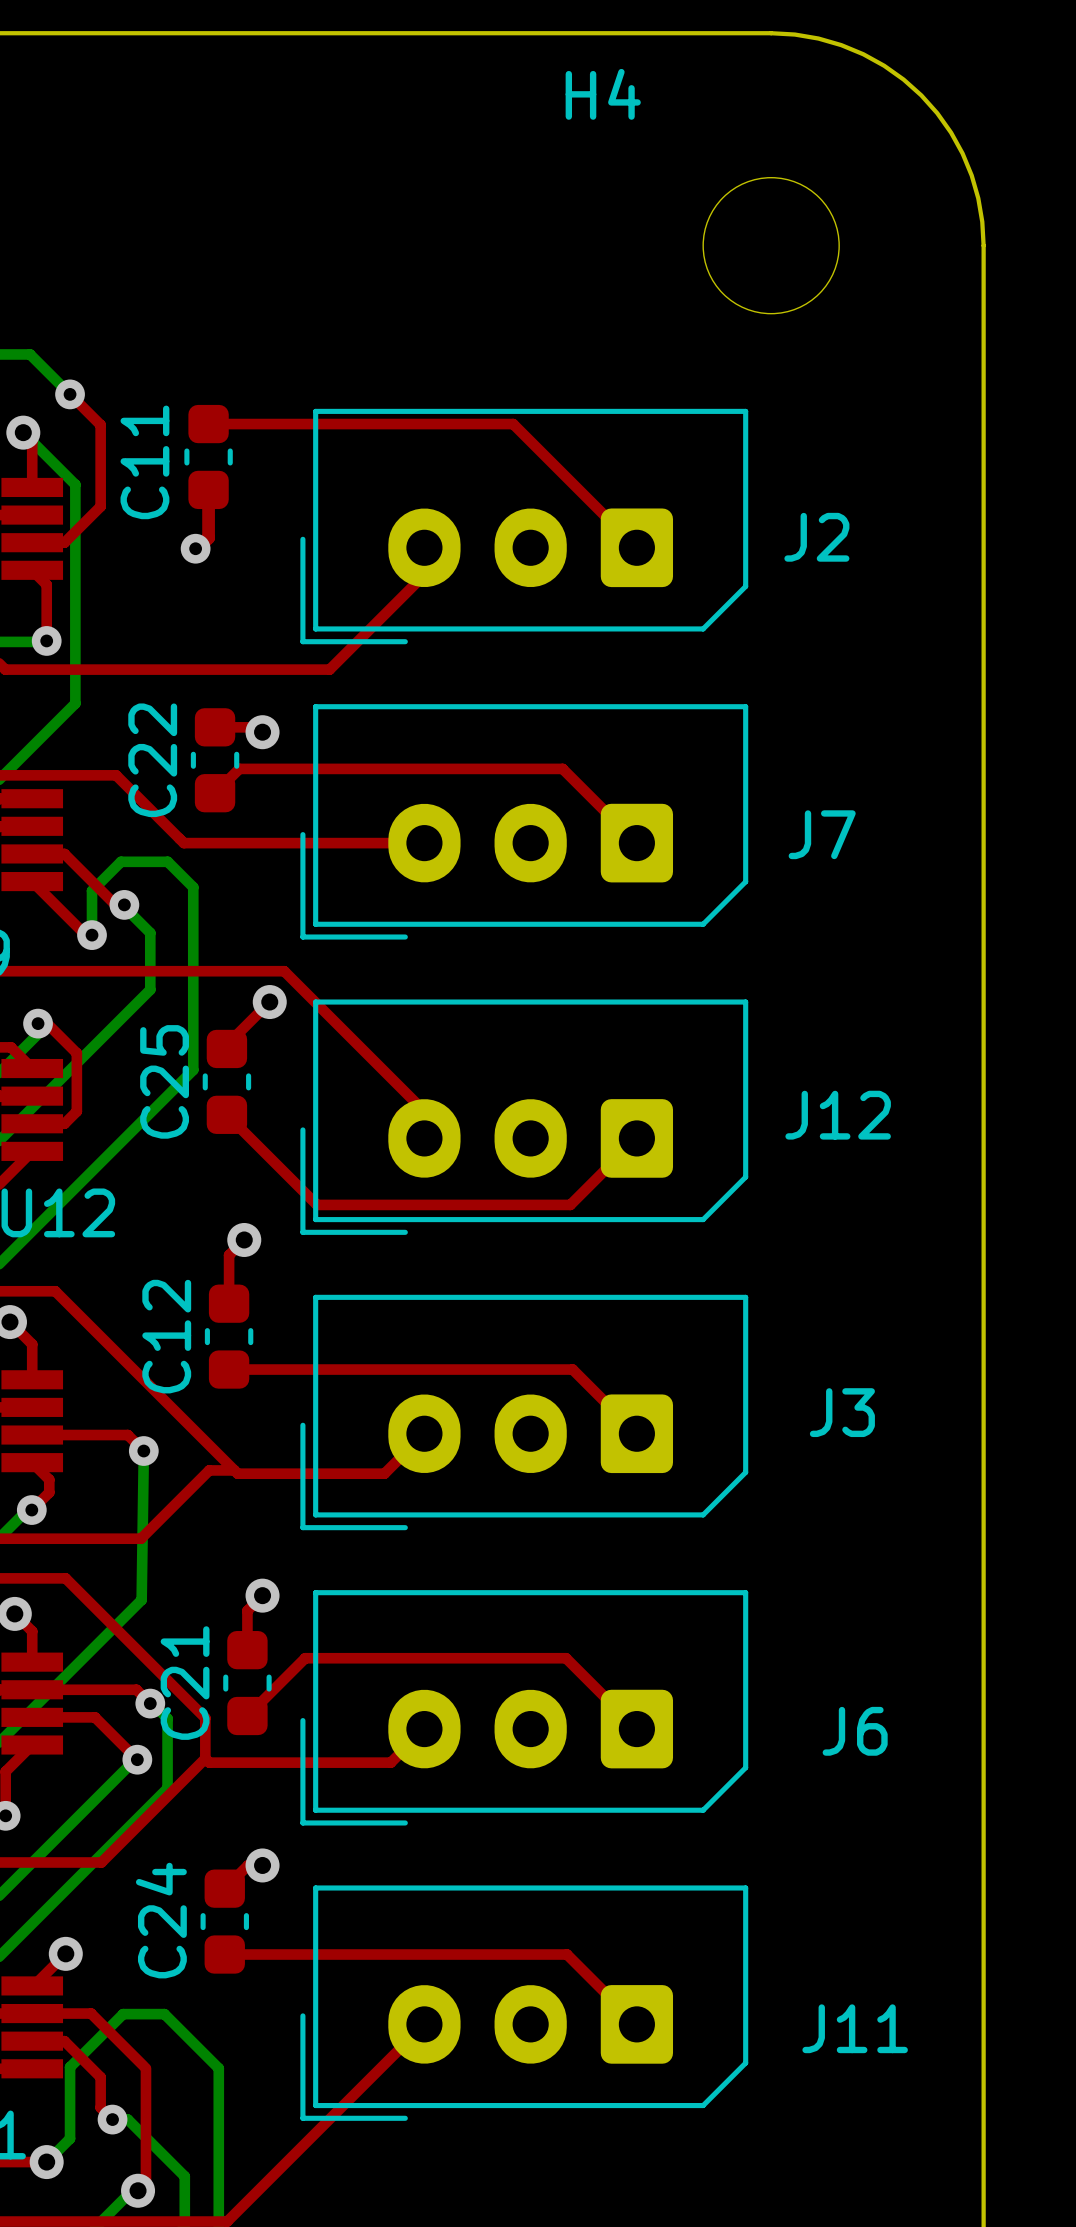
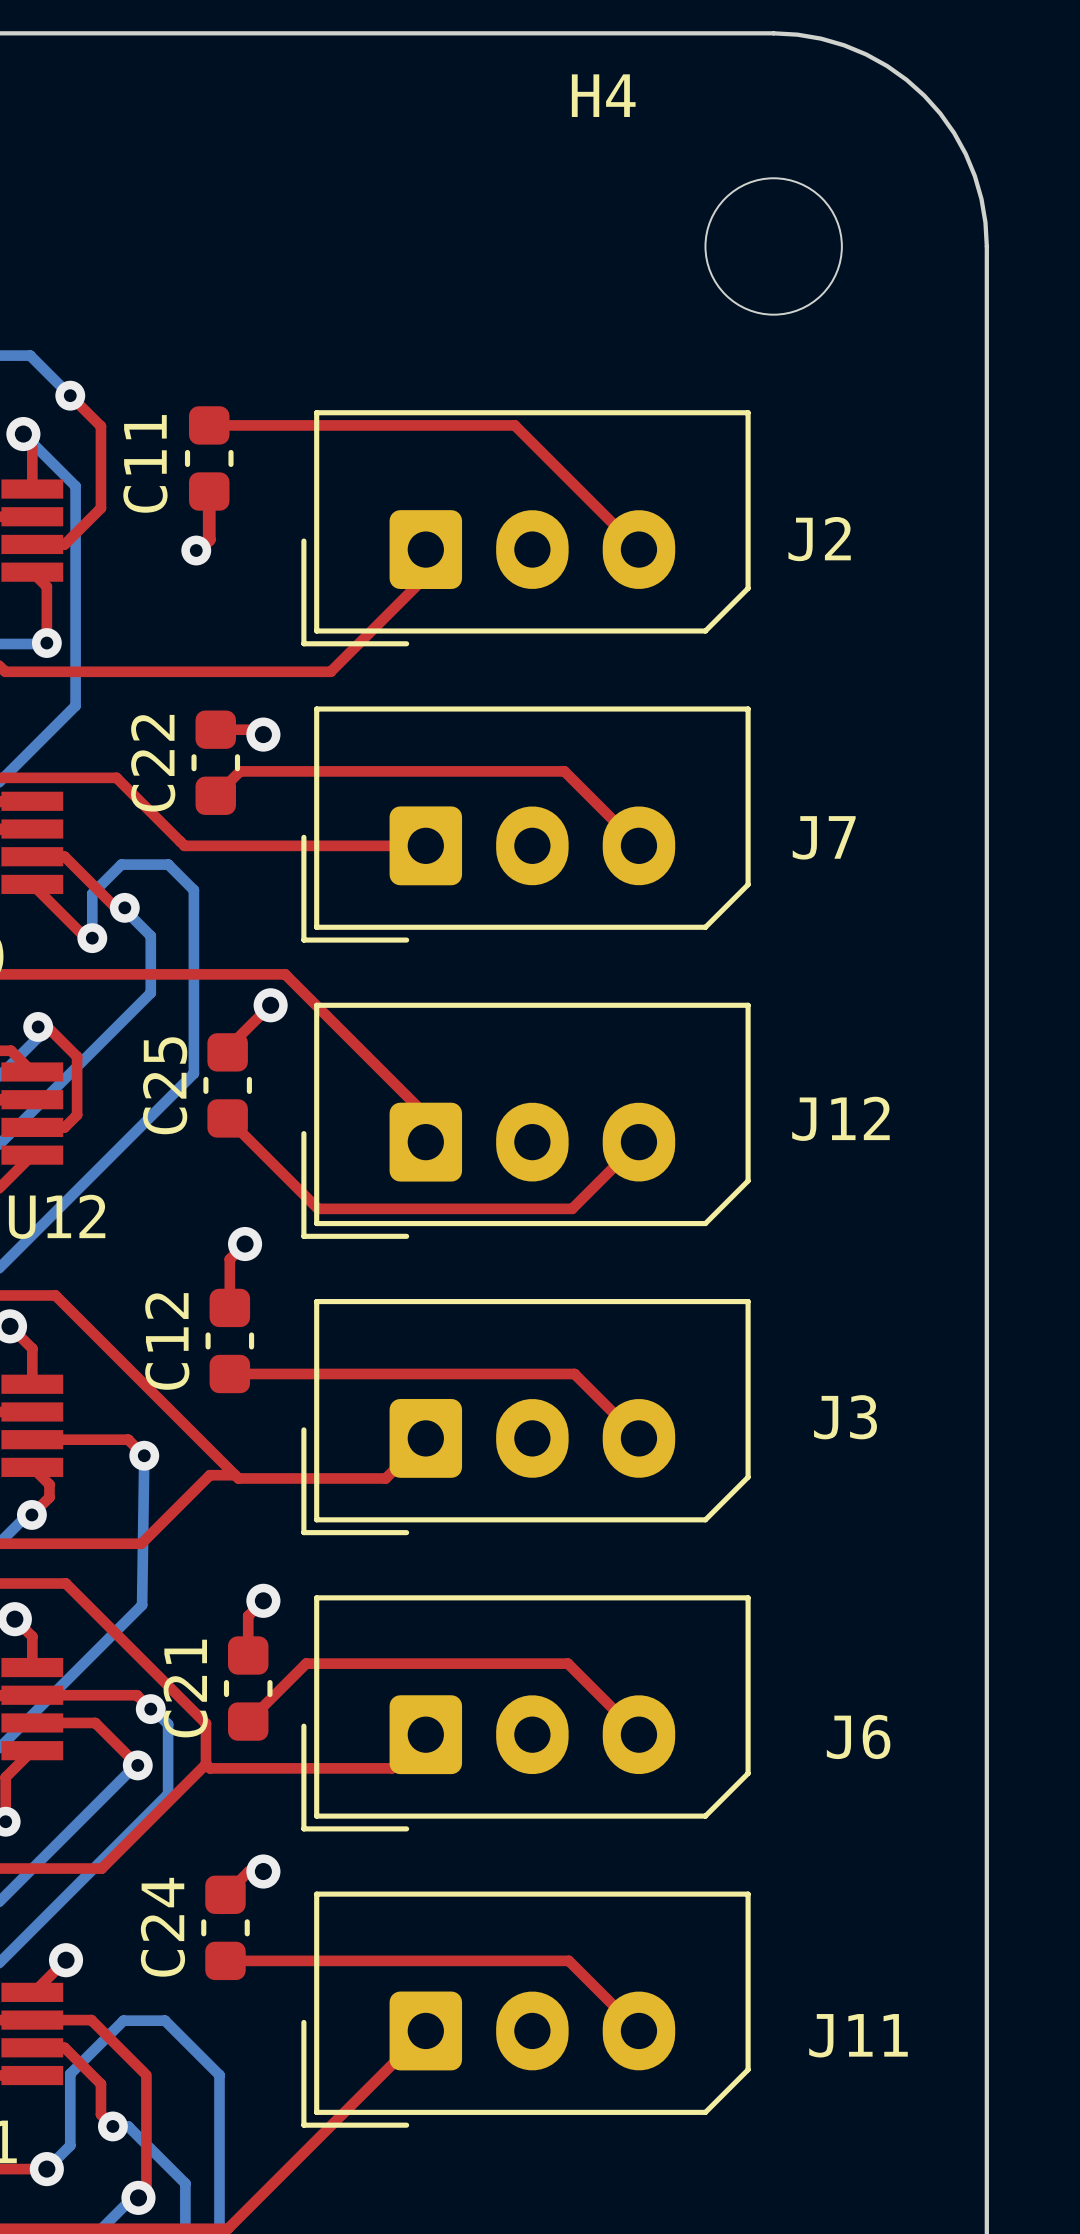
J2 footprint: [300, 408, 749, 645] -> [301, 410, 751, 647]
J7 footprint: [300, 704, 749, 940] -> [301, 706, 751, 943]
J12 footprint: [300, 999, 749, 1235] -> [301, 1002, 751, 1239]
J3 footprint: [300, 1294, 749, 1531] -> [301, 1299, 751, 1536]
J6 footprint: [300, 1590, 749, 1826] -> [301, 1595, 751, 1832]
J11 footprint: [300, 1885, 749, 2121] -> [301, 1891, 751, 2128]

